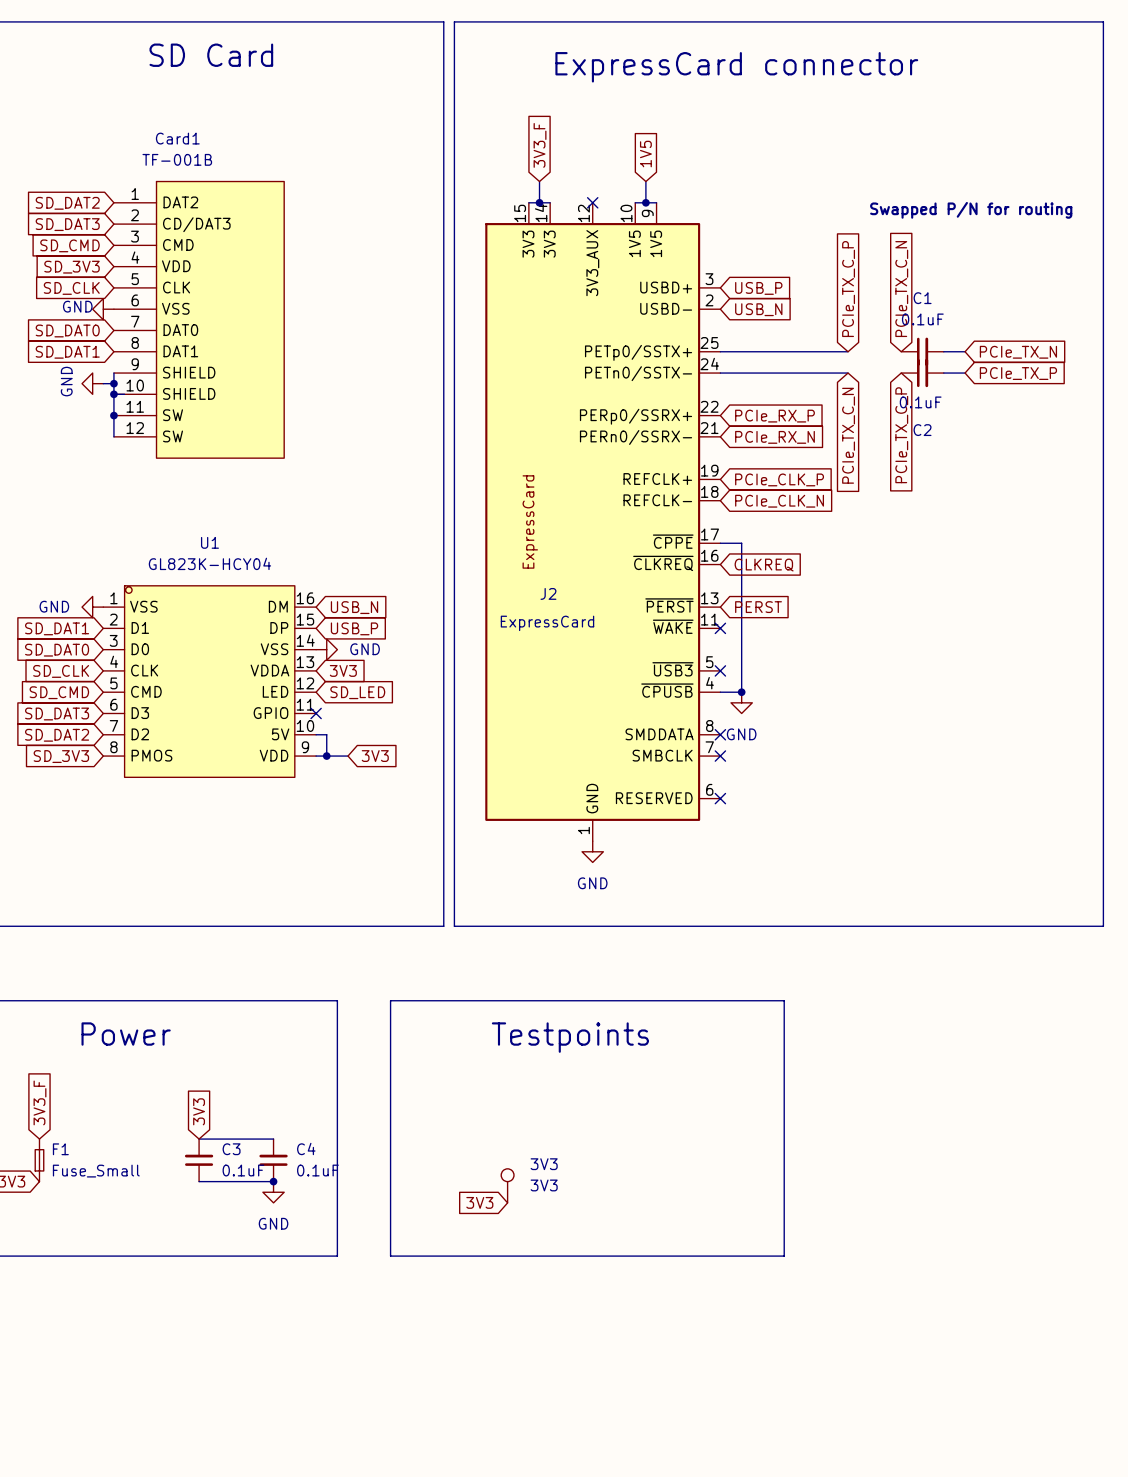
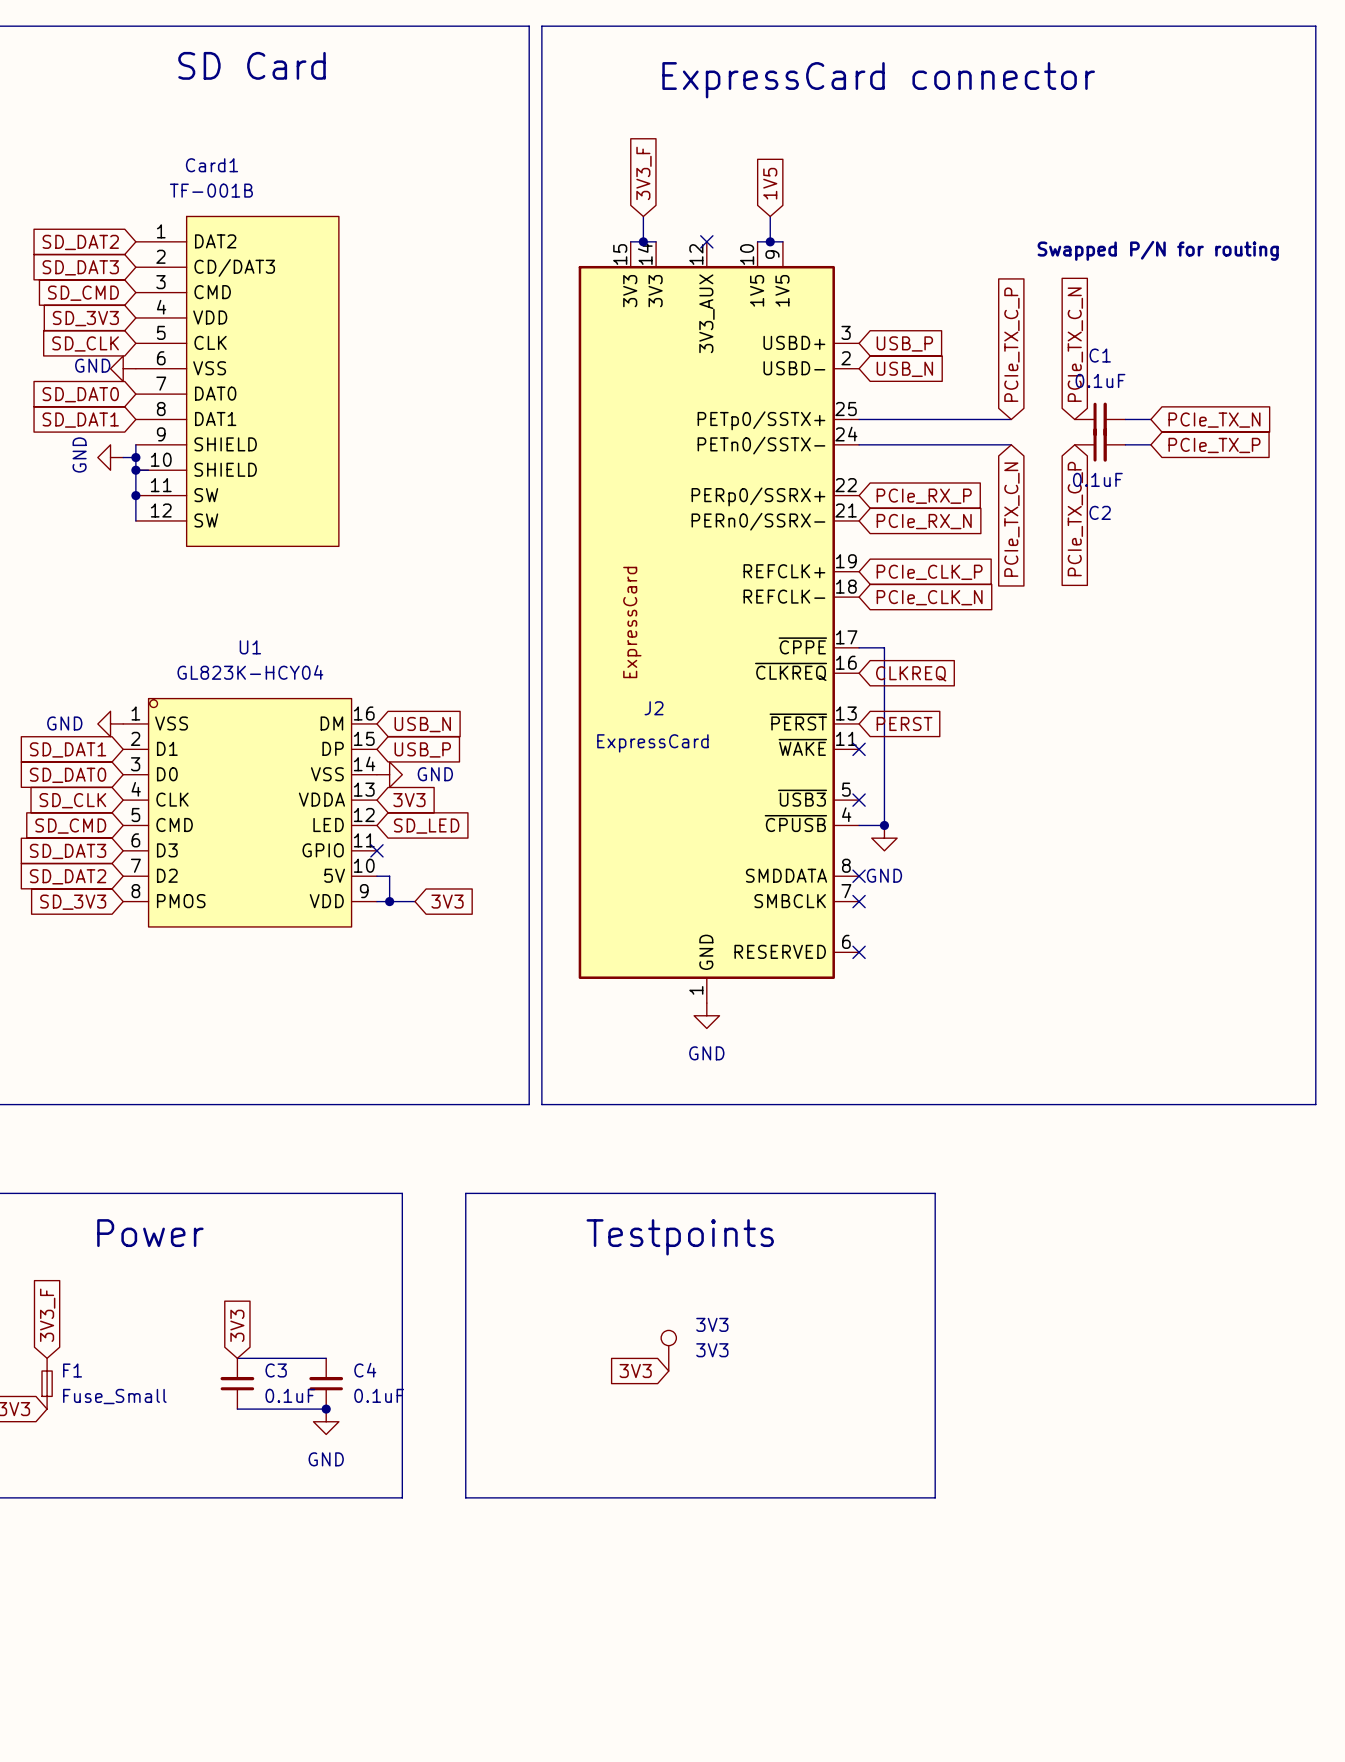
3V3 position: (507, 1185) -> (668, 1350)
global label position: 3V3 (479, 1202) -> 3V3 (635, 1371)

